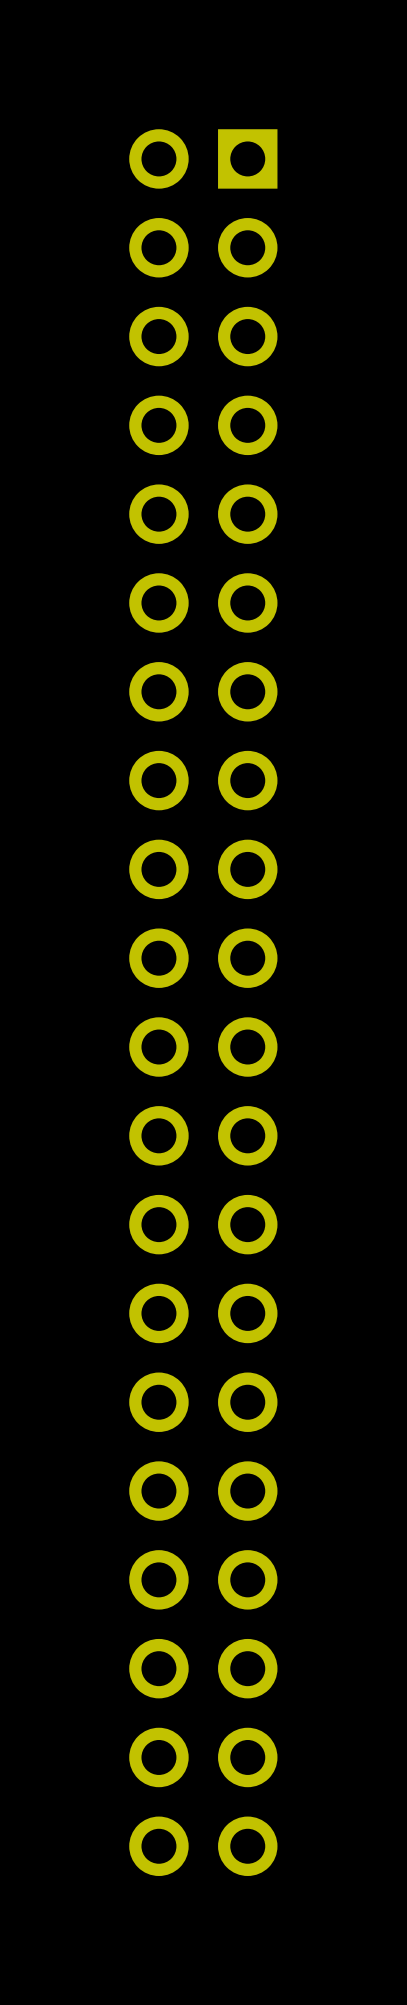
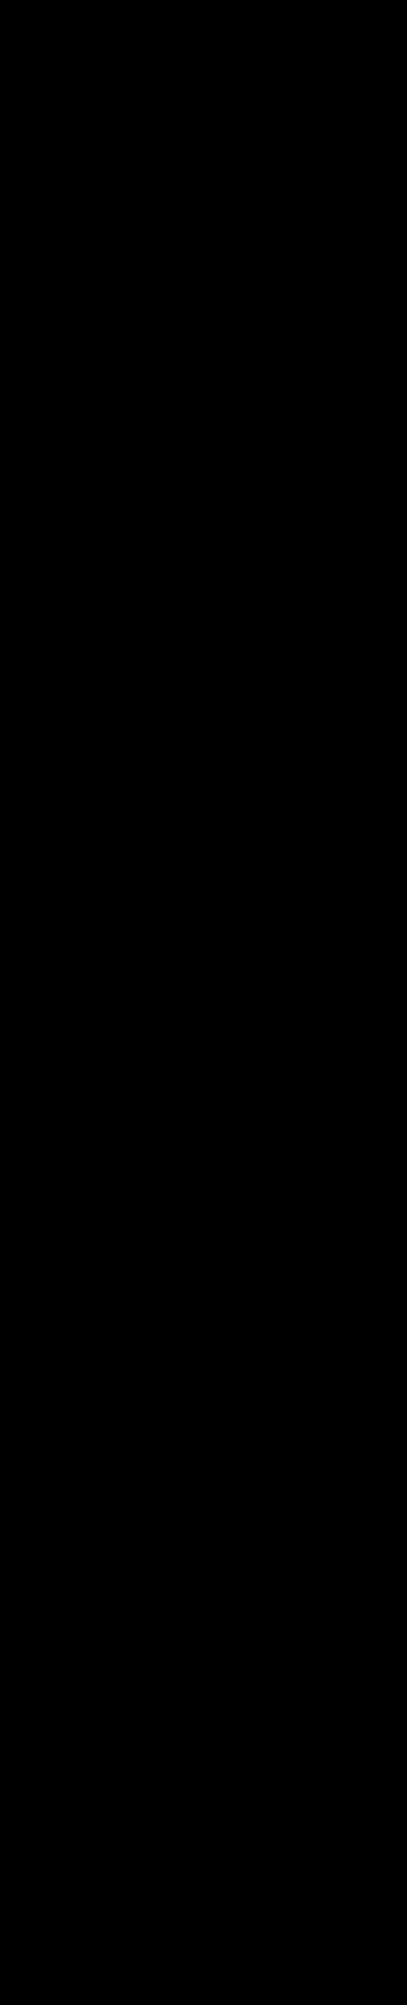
part: (203, 1002) -> none

